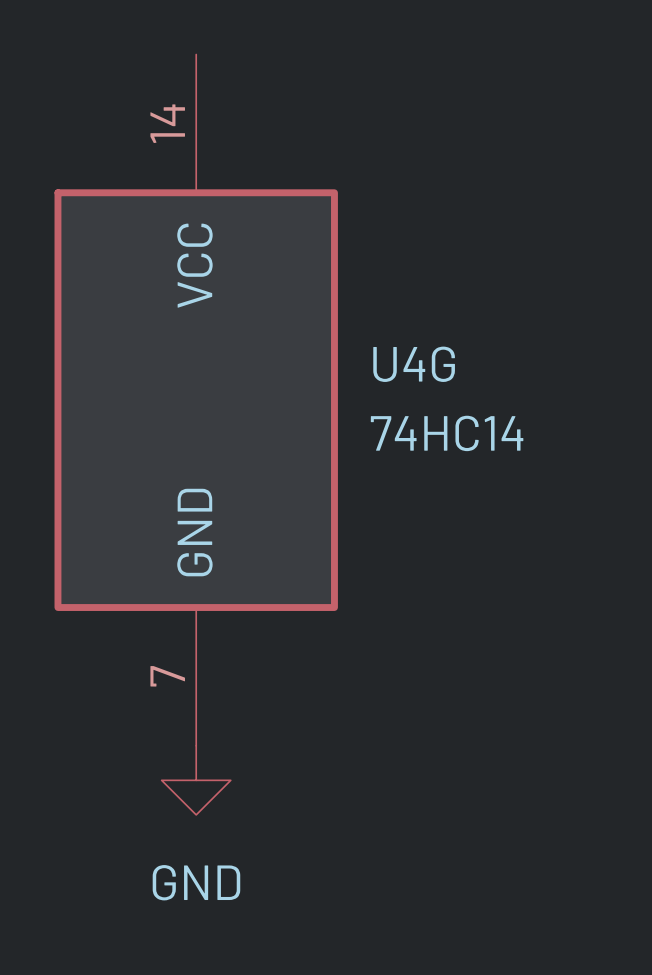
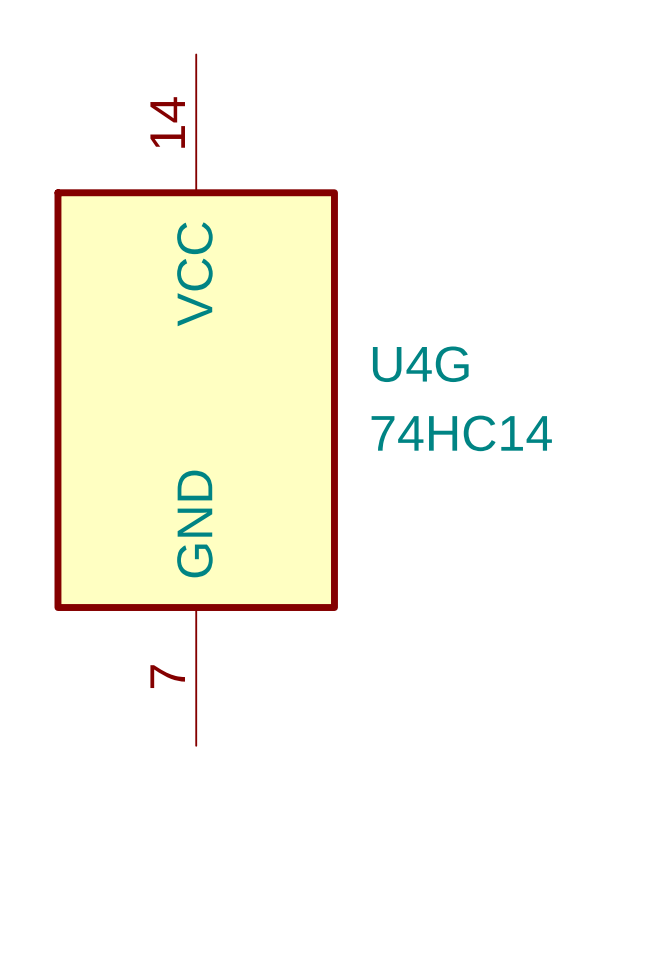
power symbol: GND (196, 780) -> none

